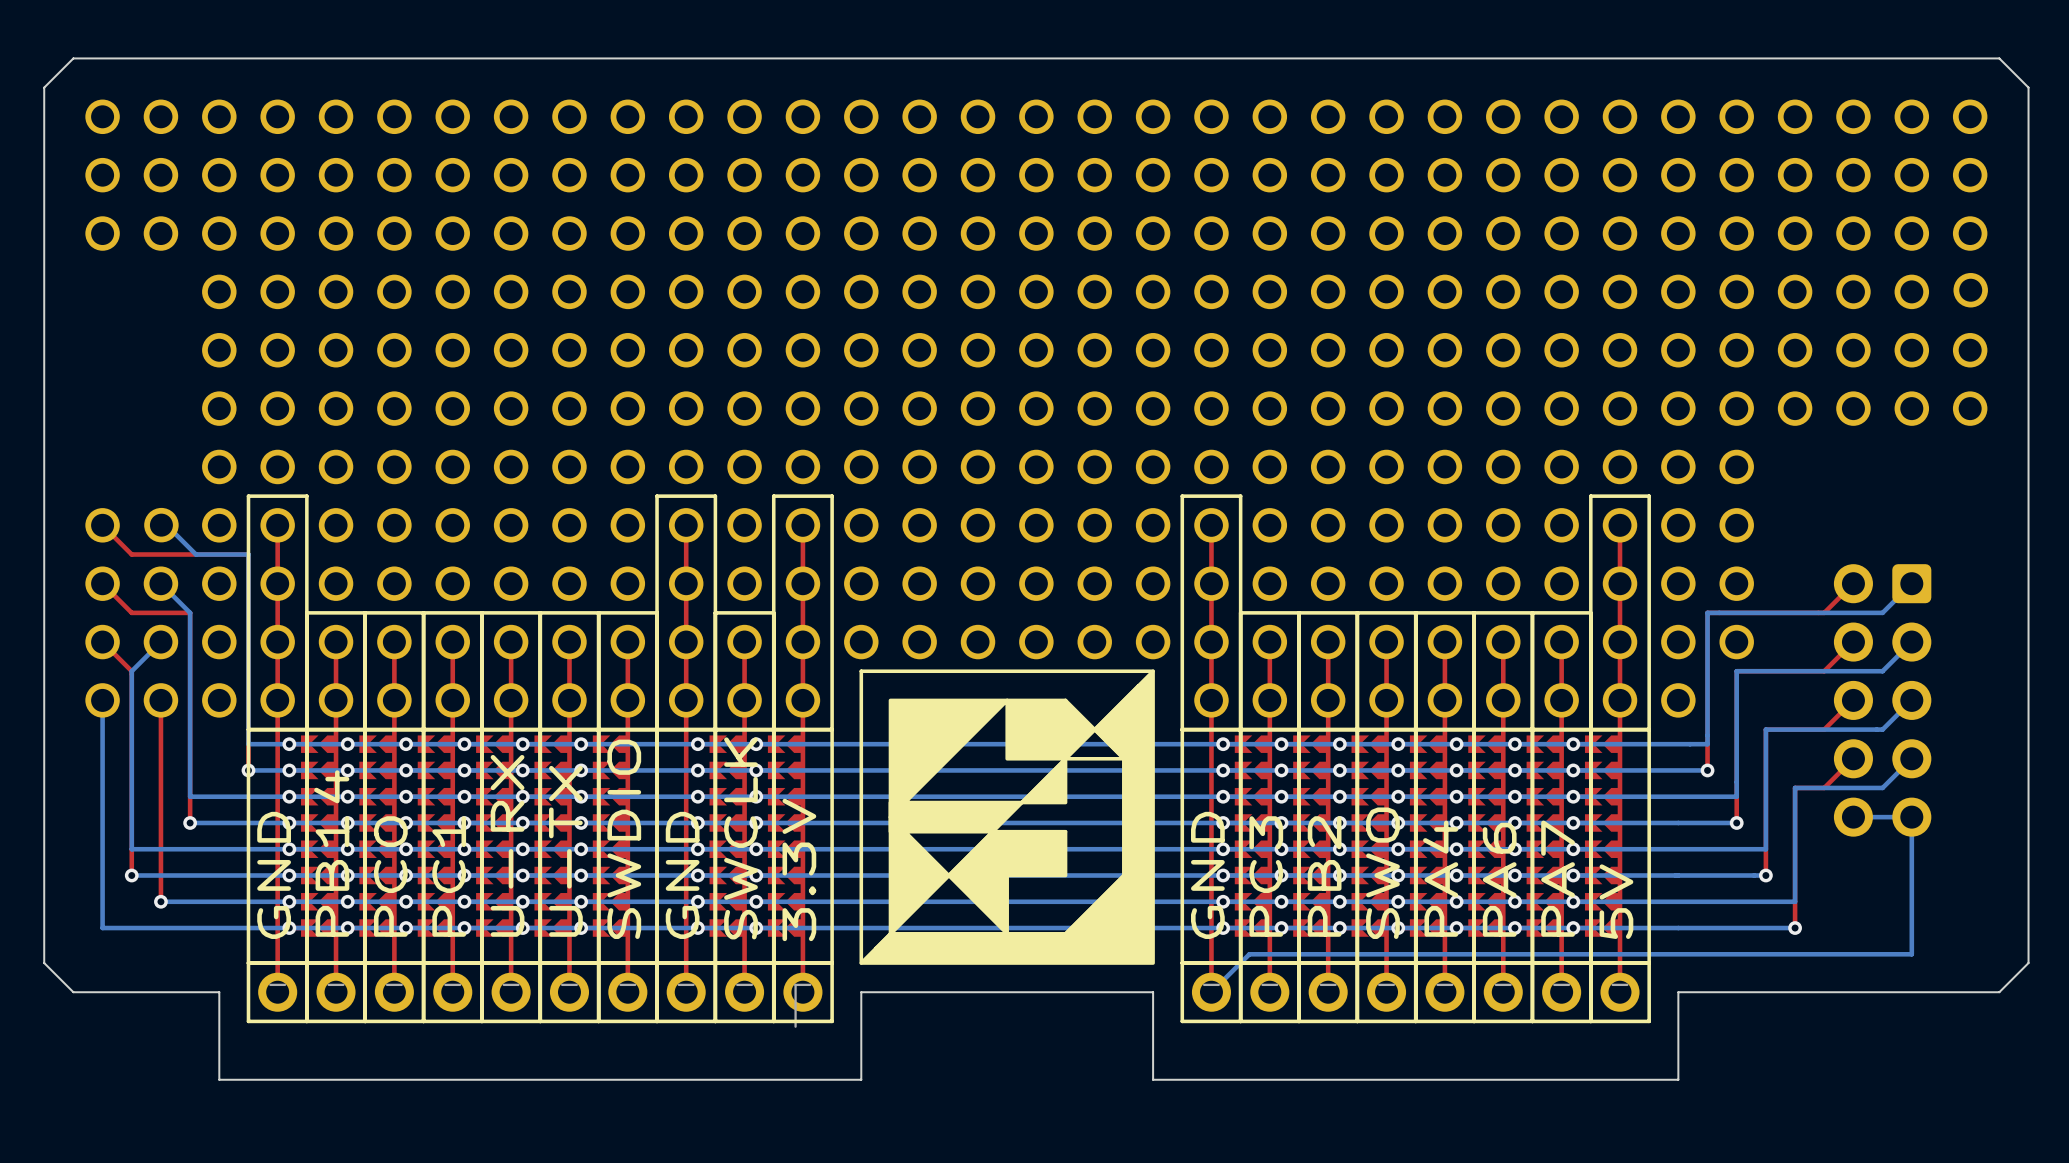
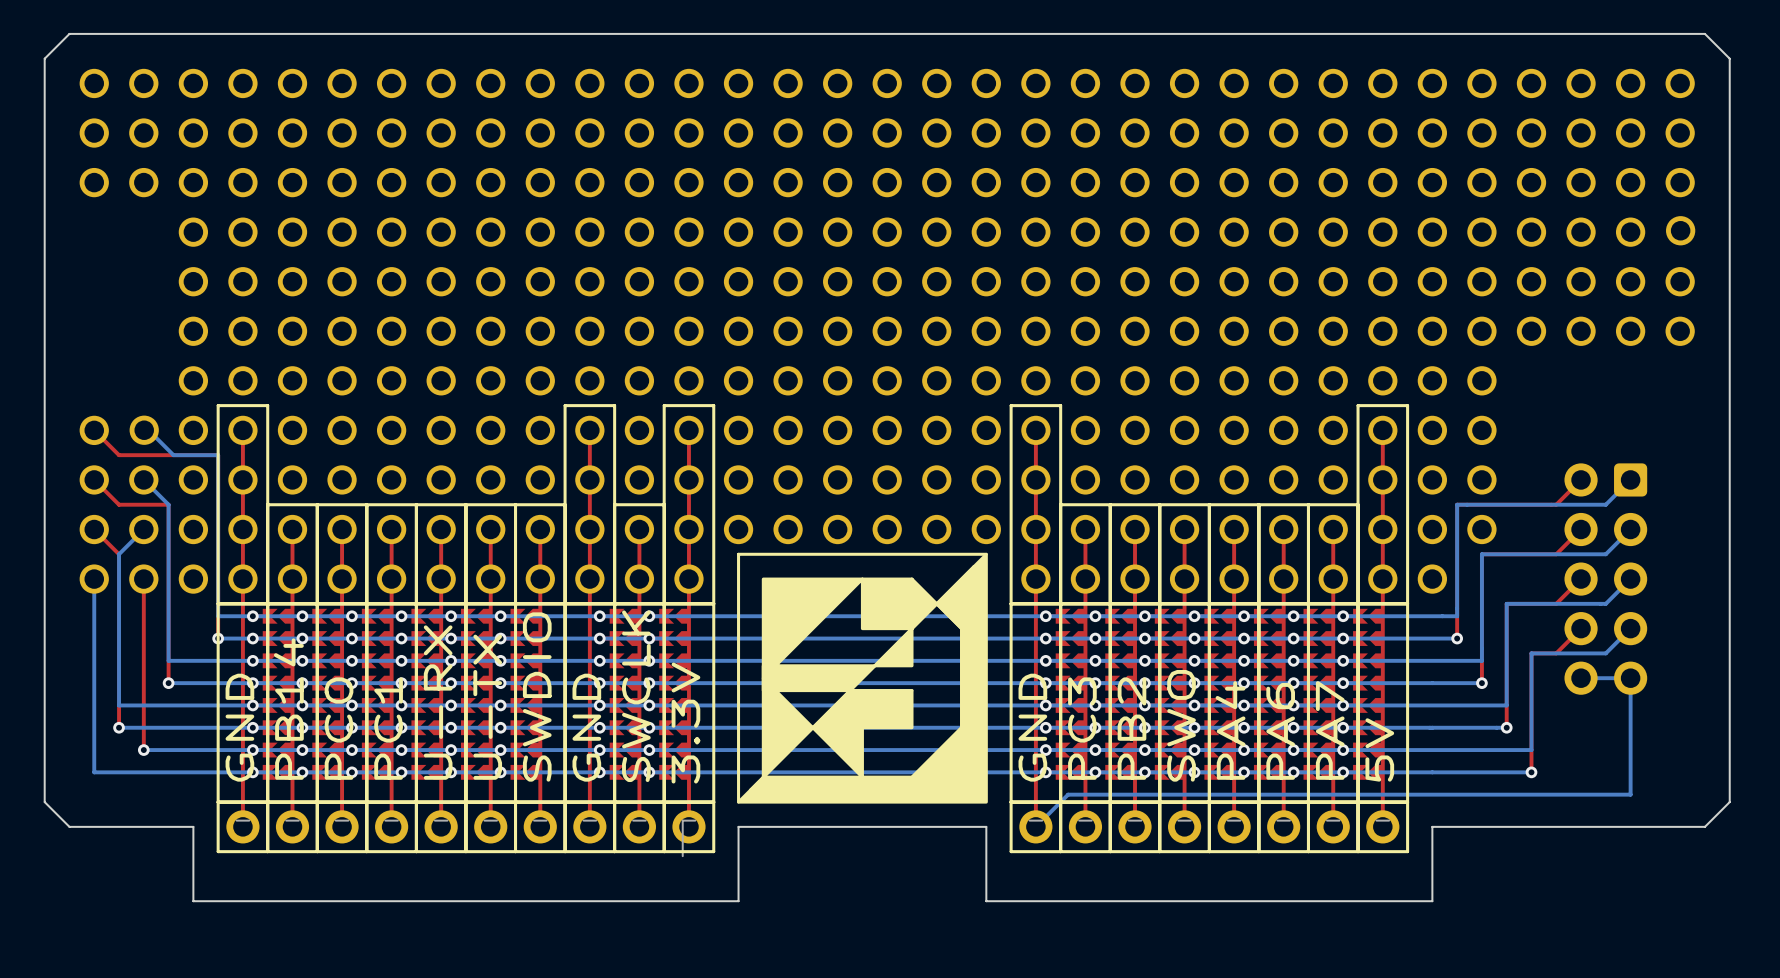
line: (1123, 758) (1065, 758) -> none

